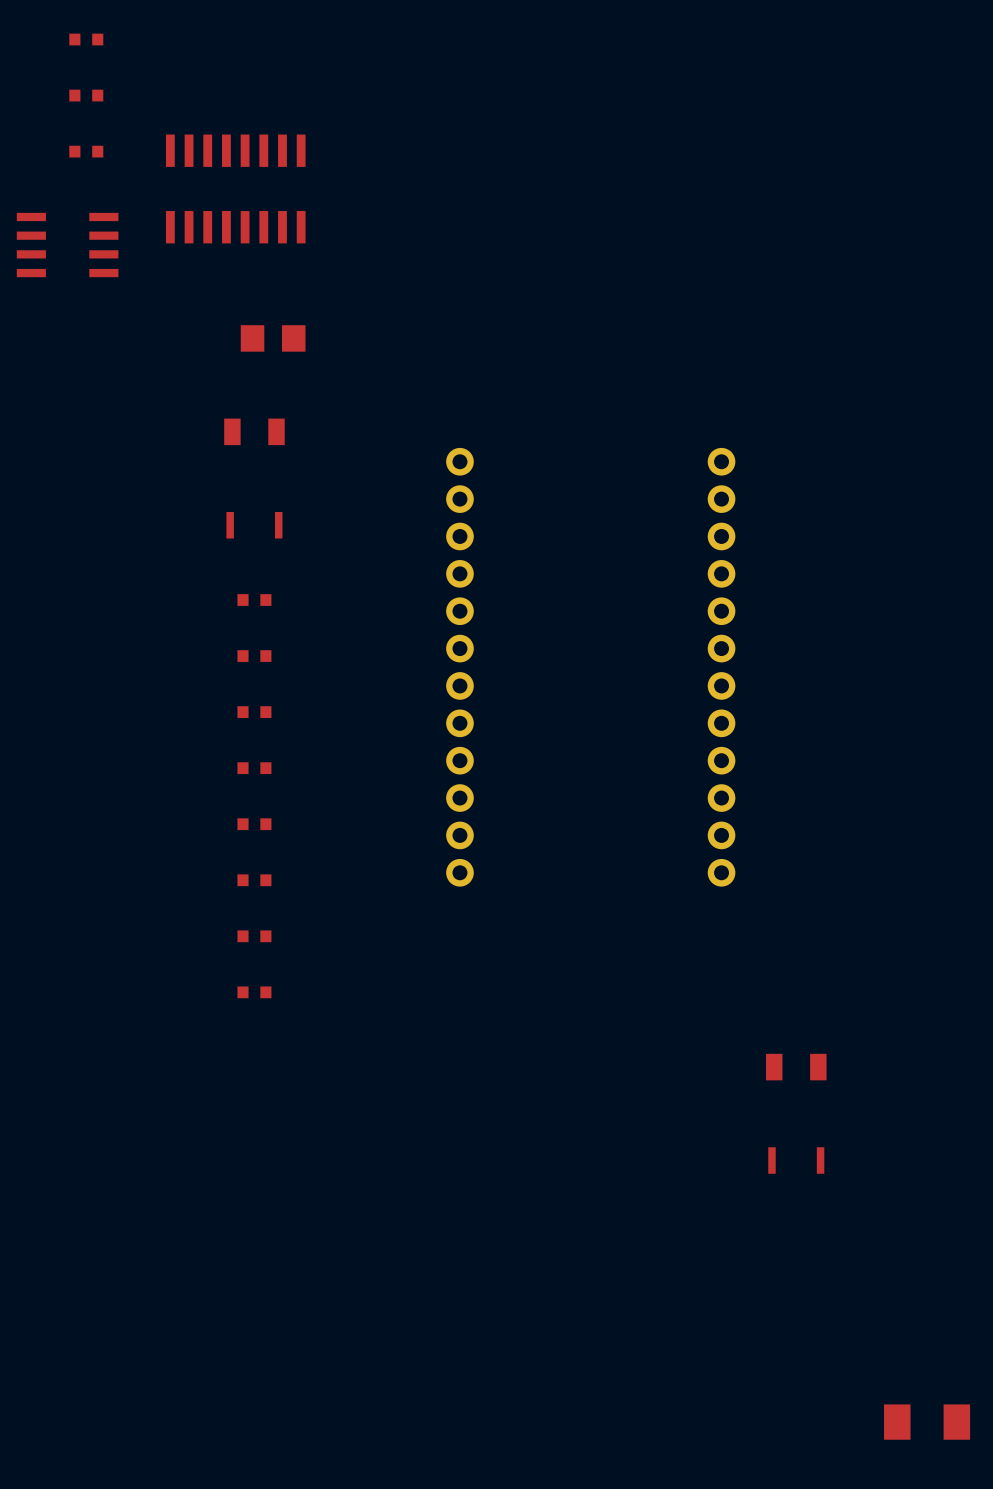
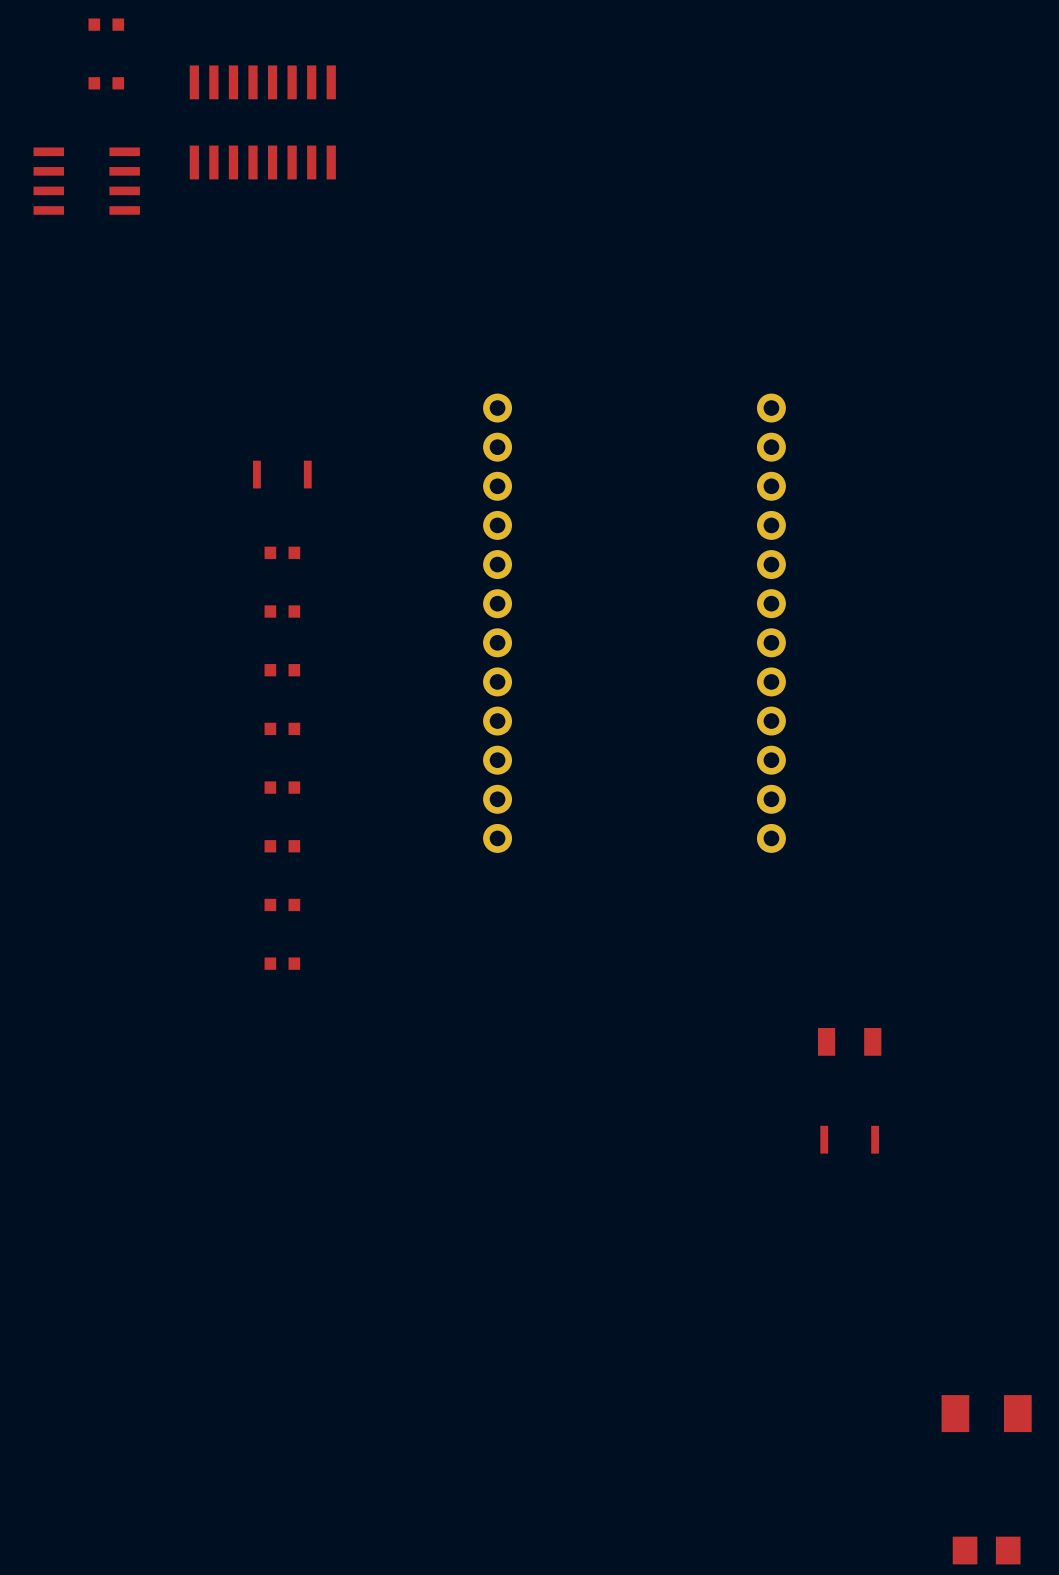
part: (273, 338) -> none
part: (254, 431) -> none

